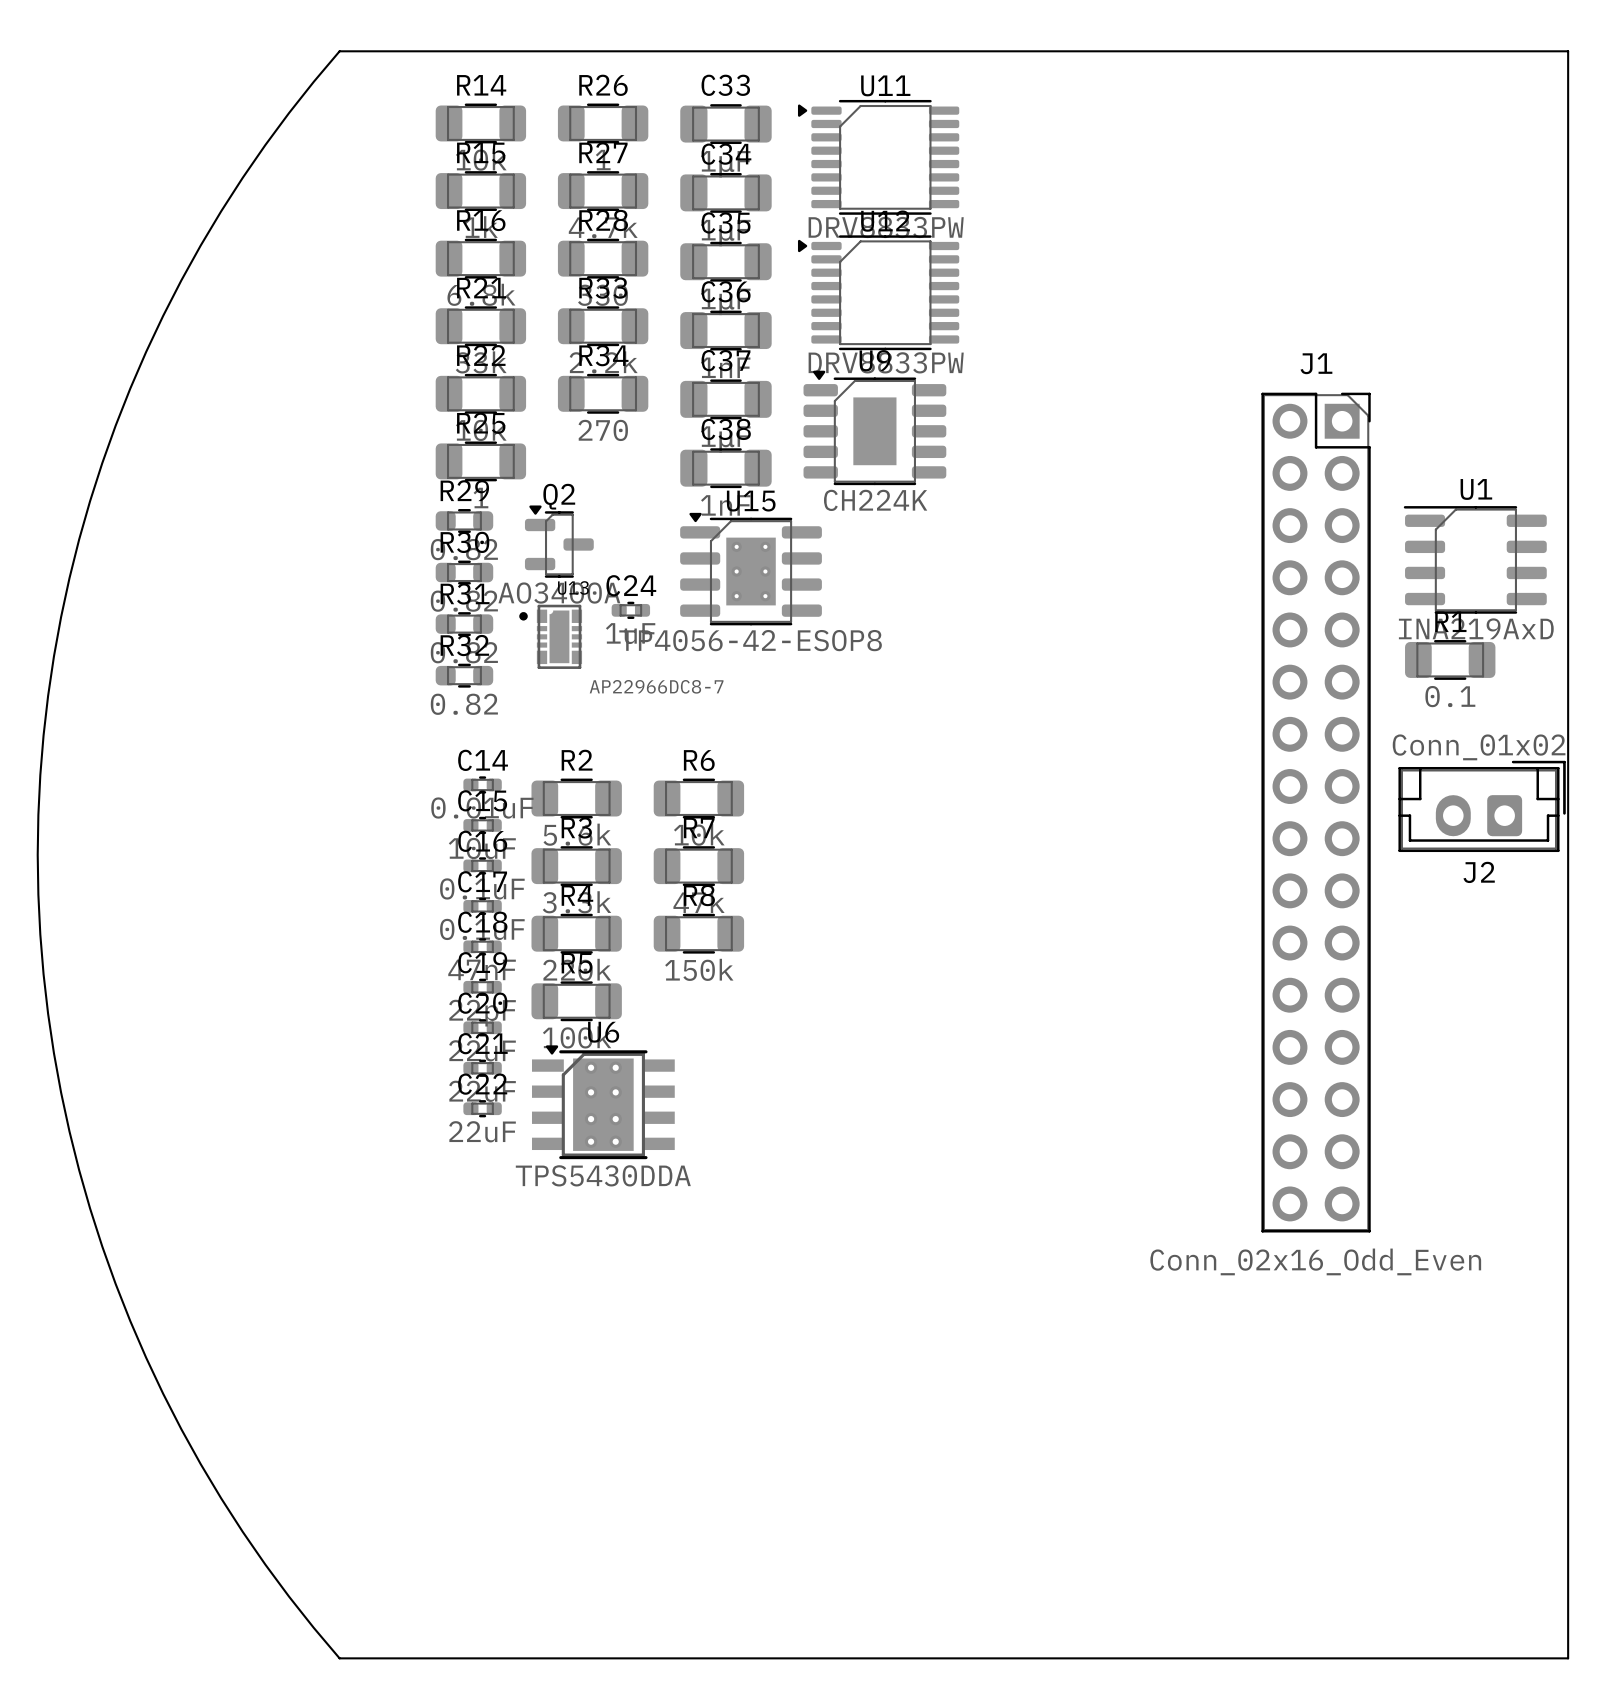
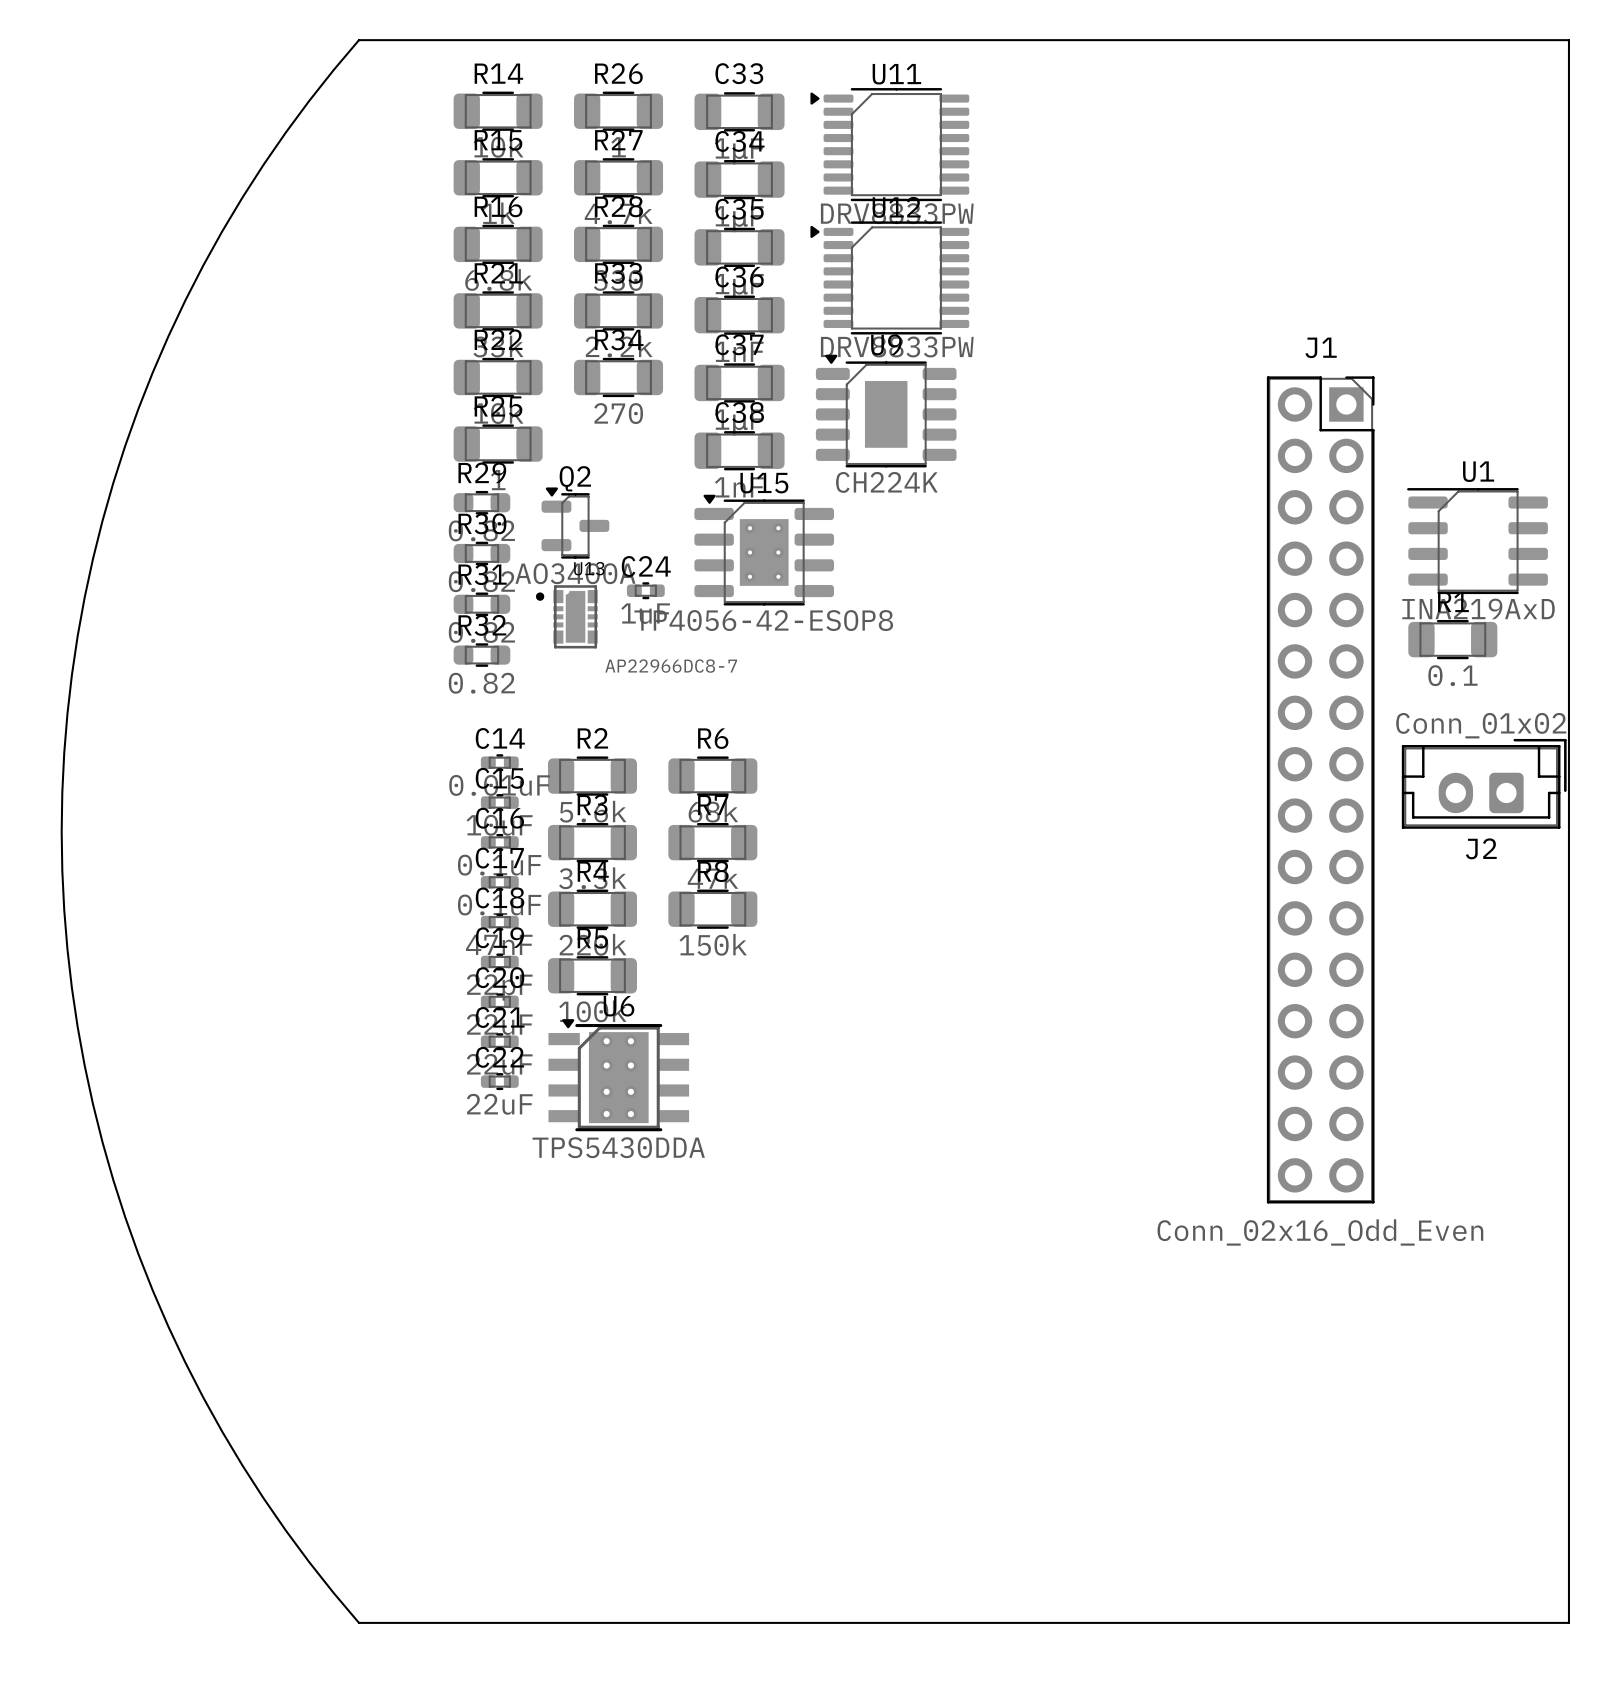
R6 value: 10k (699, 834) -> 68k (713, 811)

